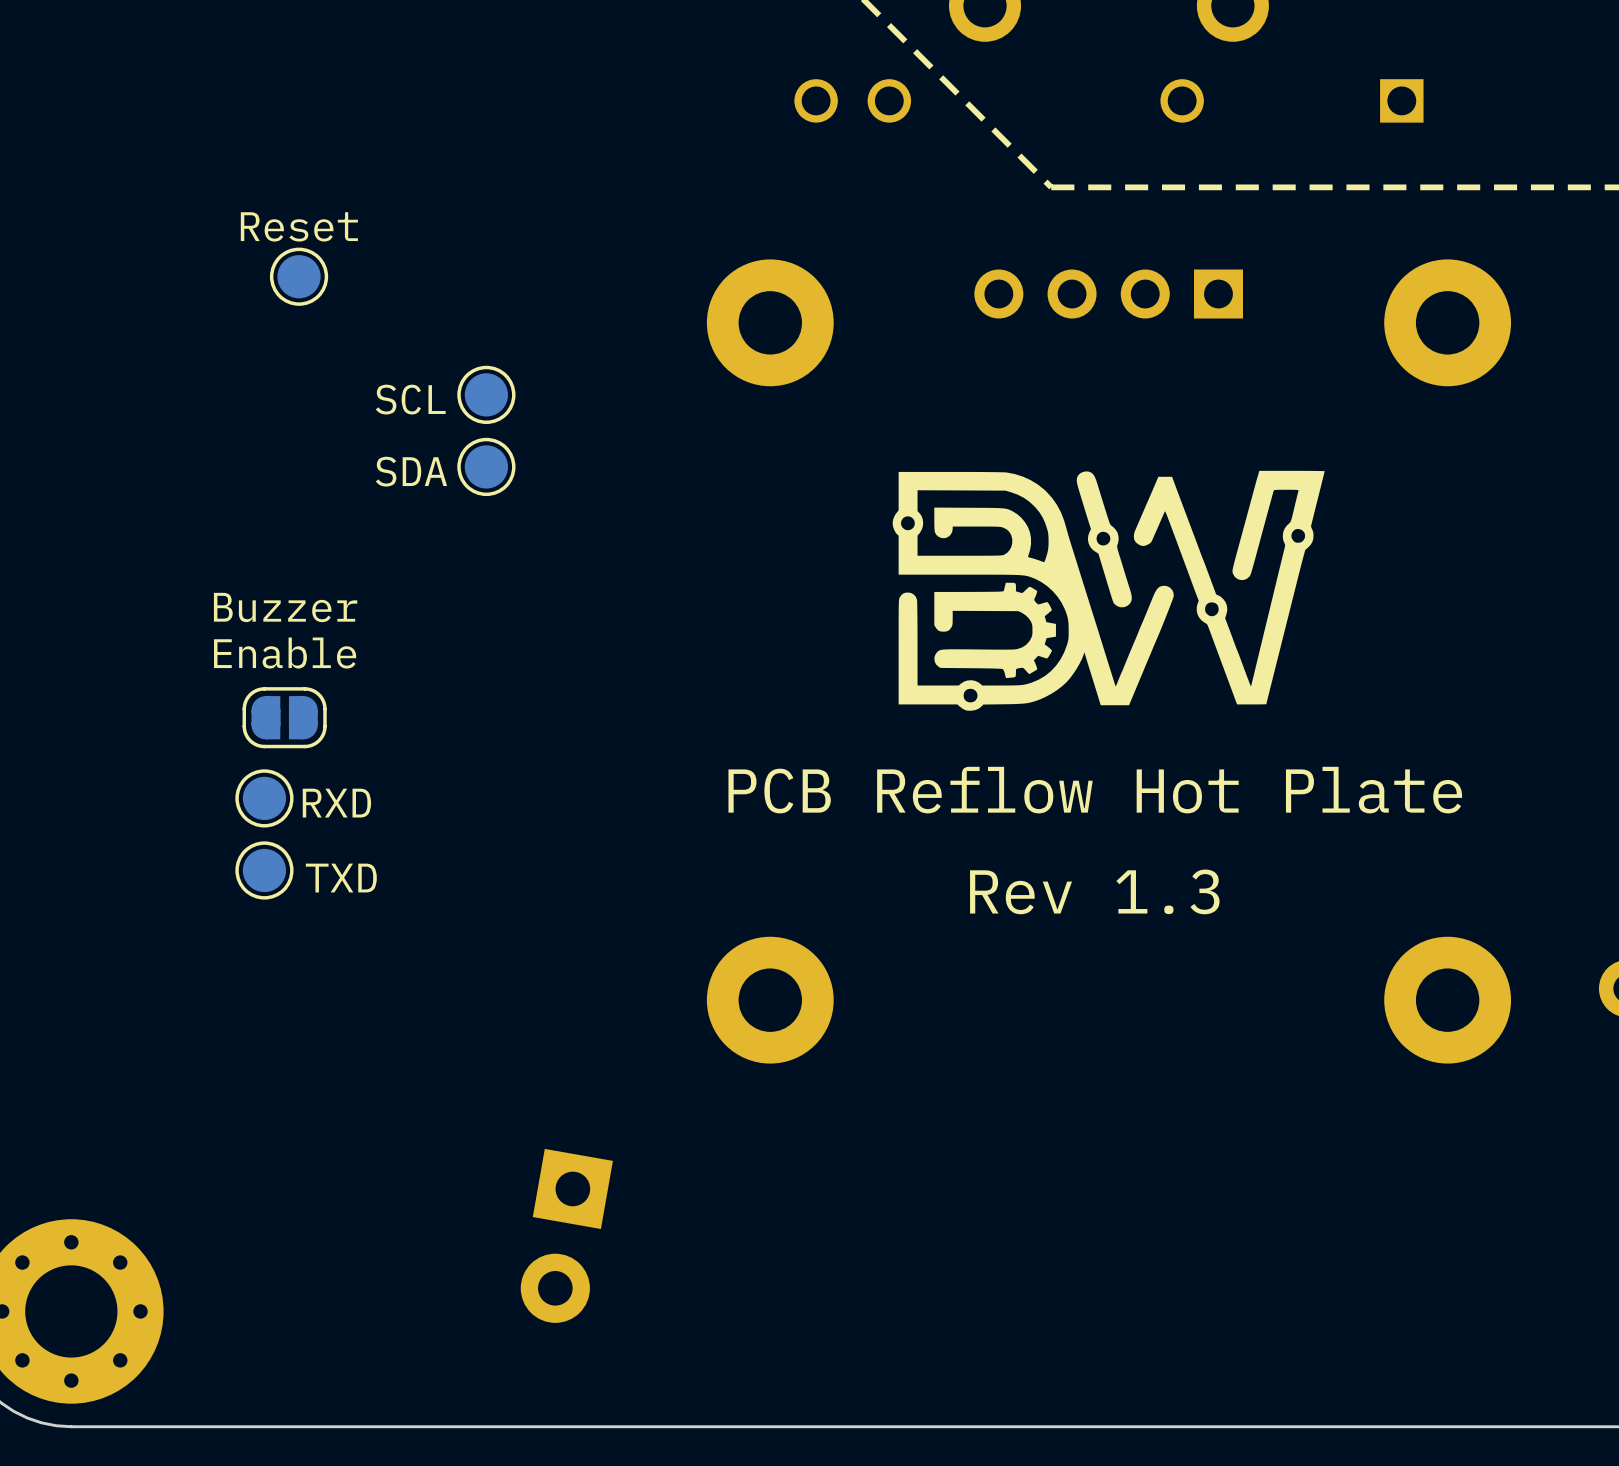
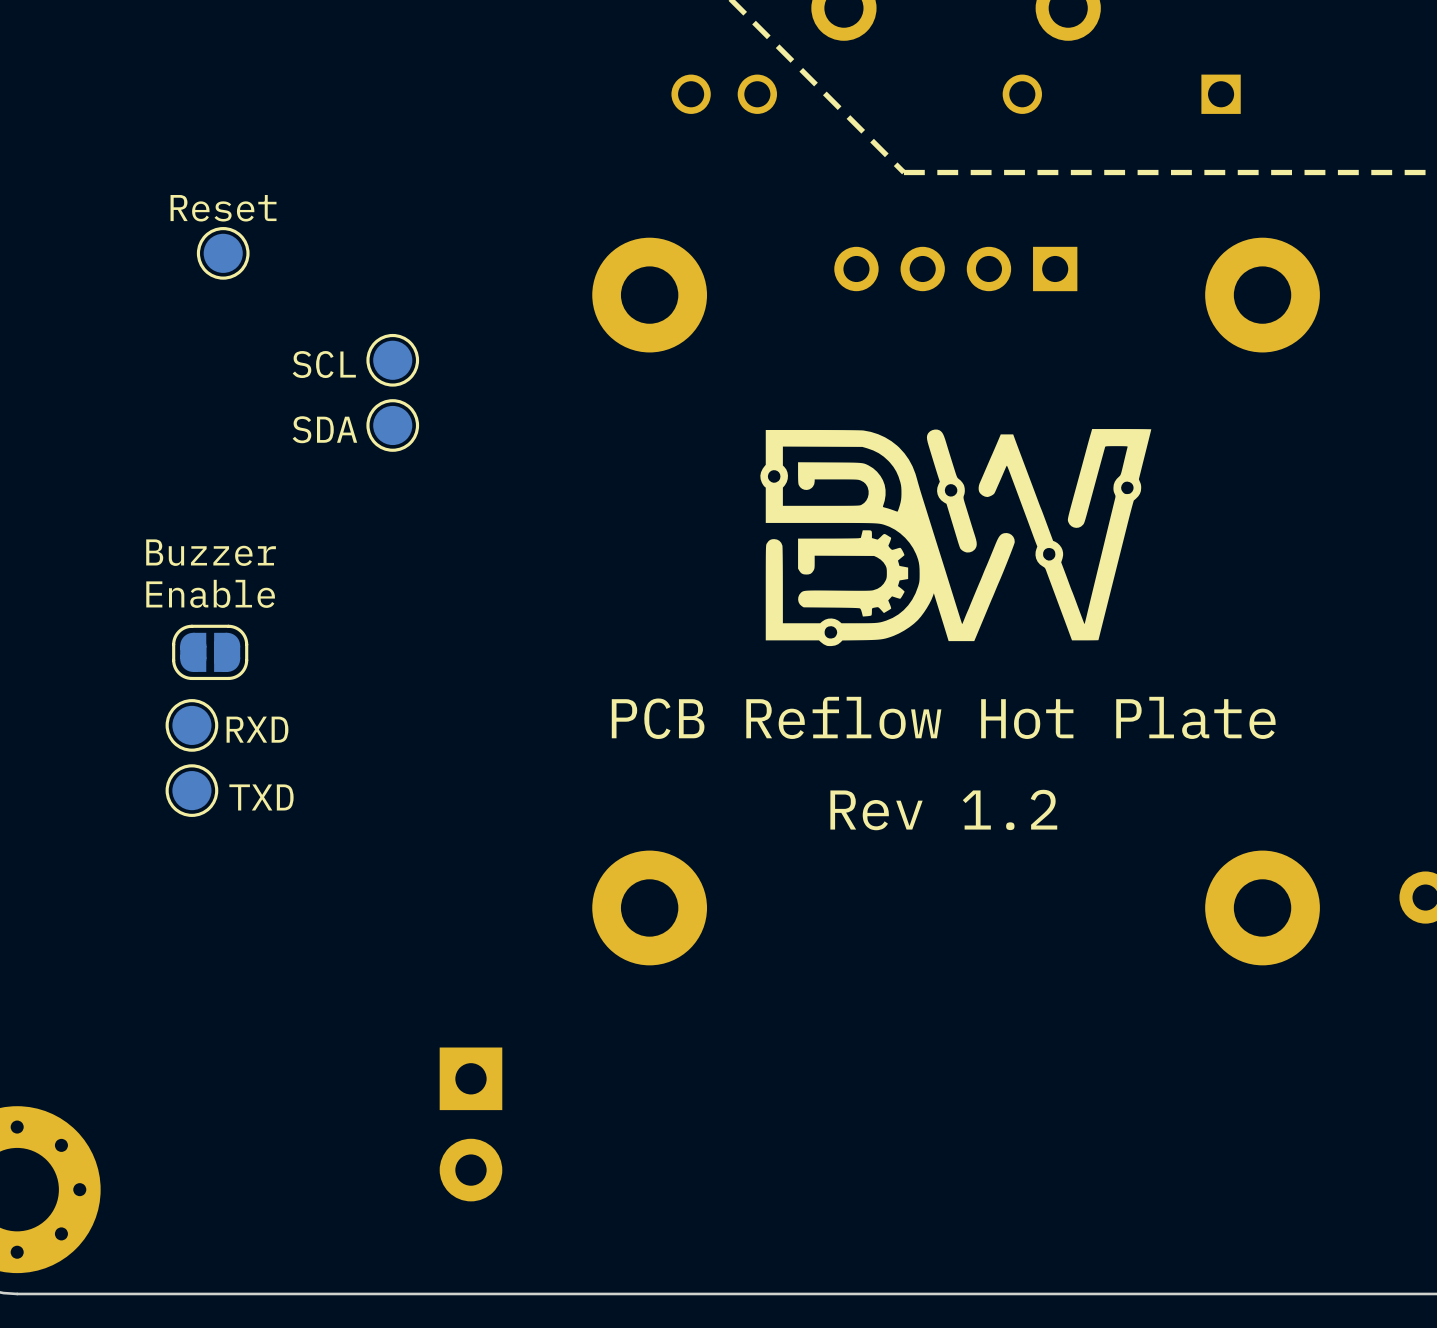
text: Rev 1.3 (1094, 891) -> Rev 1.2 (943, 810)
part rotation: 0° (566, 1235) -> 10° counterclockwise (470, 1124)

